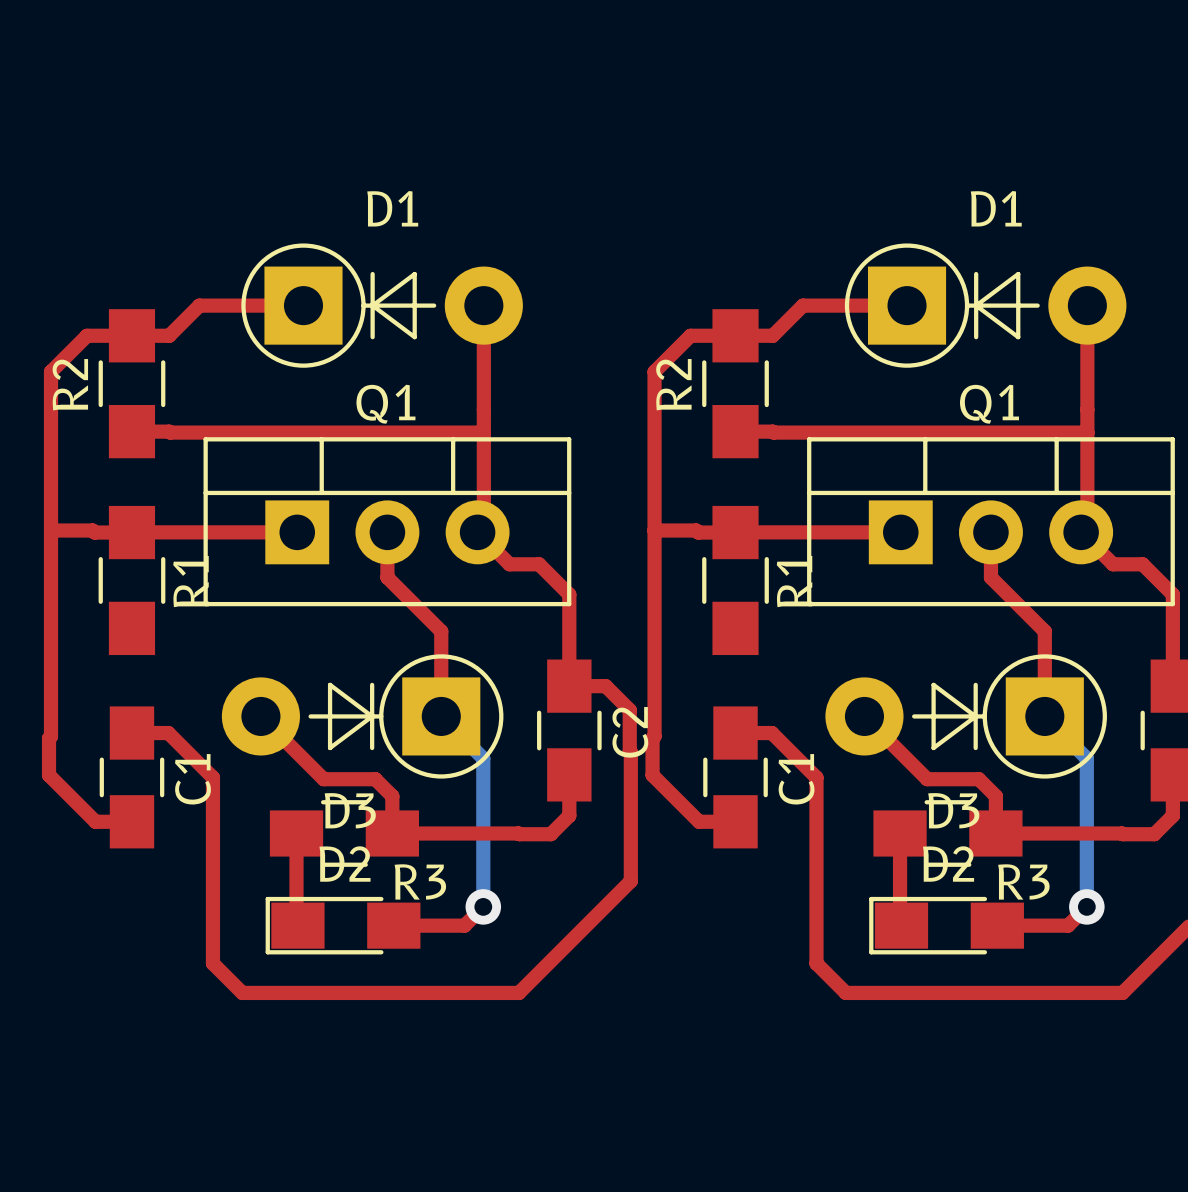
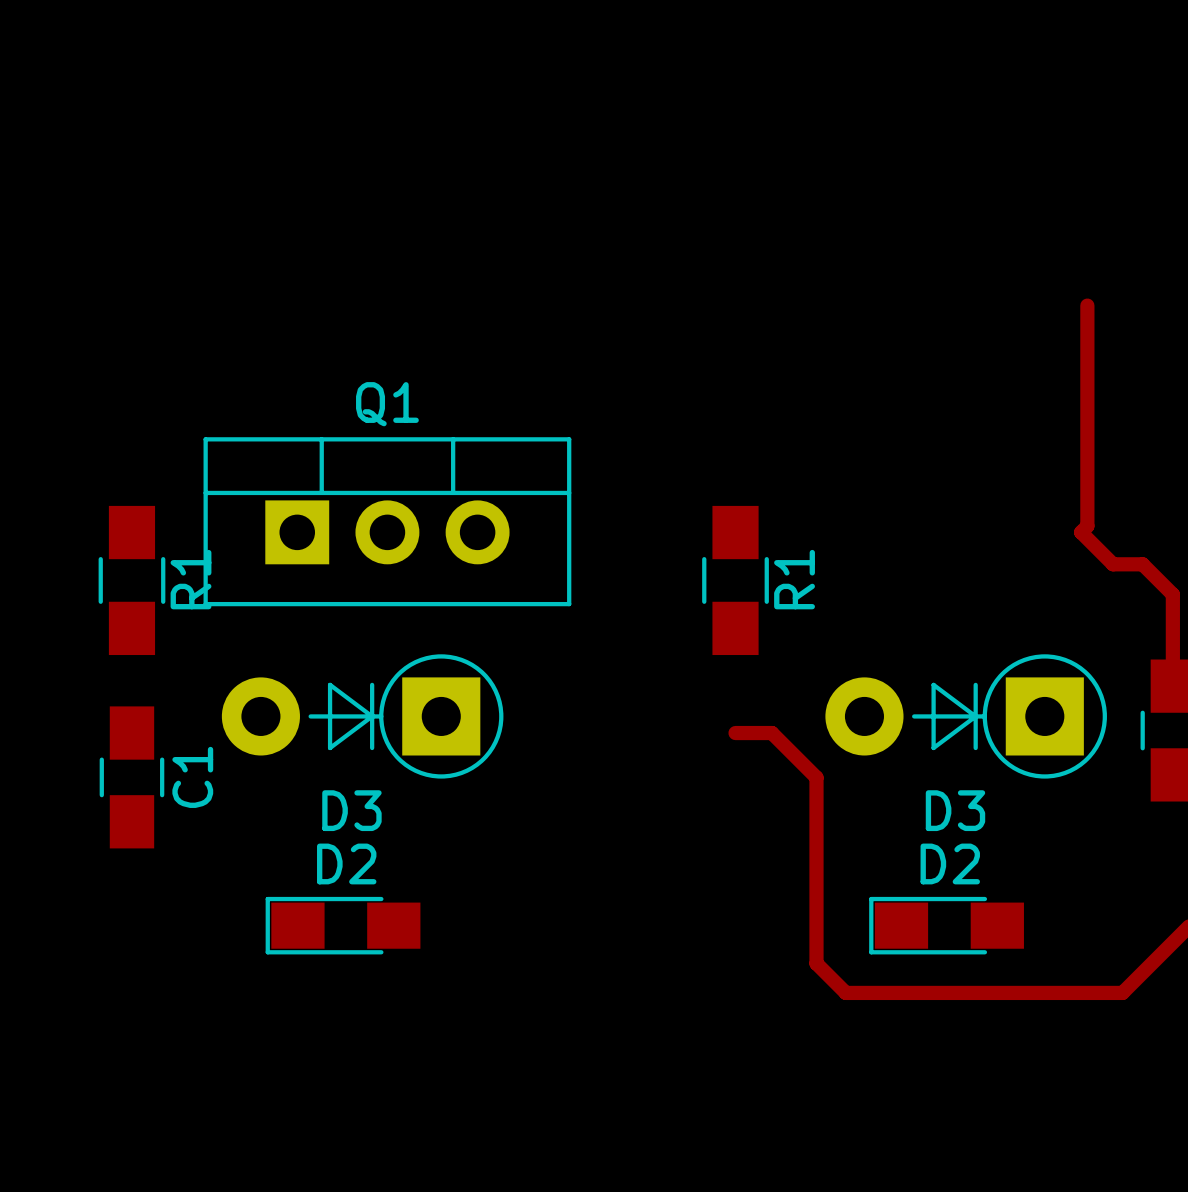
top track: (303, 305) (199, 305) (169, 335) (87, 335) (51, 371) (51, 736) (49, 738) (49, 775) (95, 821) (131, 821) -> none
D1: (382, 305) -> none
top track: (483, 305) (483, 526) (477, 532) (509, 564) (539, 564) (569, 594) (569, 686) (605, 686) (629, 710) (630, 881) (519, 992) (242, 992) (212, 963) (212, 777) (168, 733) (131, 733) -> none
top track: (907, 305) (802, 305) (772, 335) (690, 335) (654, 371) (654, 736) (652, 738) (652, 775) (699, 821) (735, 821) -> none
D1: (985, 305) -> none
R2: (131, 383) -> none
R2: (735, 383) -> none
top track: (131, 431) (483, 432) -> none
top track: (735, 431) (1087, 432) -> none
Q1: (990, 521) -> none
top track: (51, 530) (131, 532) -> none
top track: (654, 530) (735, 532) -> none
top track: (132, 532) (297, 532) -> none
top track: (387, 532) (387, 577) (441, 631) (441, 716) -> none
top track: (735, 532) (900, 532) -> none
top track: (990, 532) (990, 577) (1044, 631) (1044, 716) -> none
top track: (260, 716) (323, 779) (375, 779) (392, 796) (392, 833) (550, 834) (569, 815) (569, 774) -> none
bottom track: (441, 716) (483, 758) (483, 906) -> none
top track: (864, 716) (927, 779) (978, 779) (995, 796) (995, 833) (1154, 834) (1172, 815) (1172, 774) -> none
bottom track: (1044, 716) (1086, 758) (1086, 906) -> none
C2: (569, 730) -> none
C1: (735, 777) -> none
top track: (296, 833) (297, 925) -> none
R3: (344, 833) -> none
top track: (900, 833) (901, 925) -> none
R3: (947, 833) -> none
top track: (483, 906) (464, 925) (393, 925) -> none
via: (483, 906) -> none
top track: (1086, 906) (1068, 925) (997, 925) -> none
via: (1086, 906) -> none

